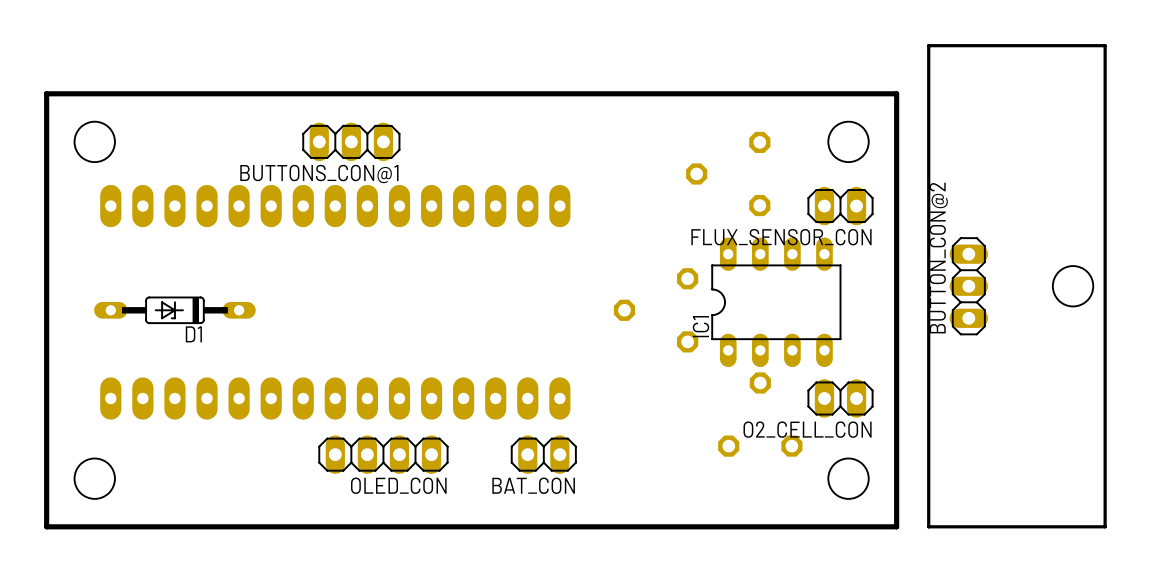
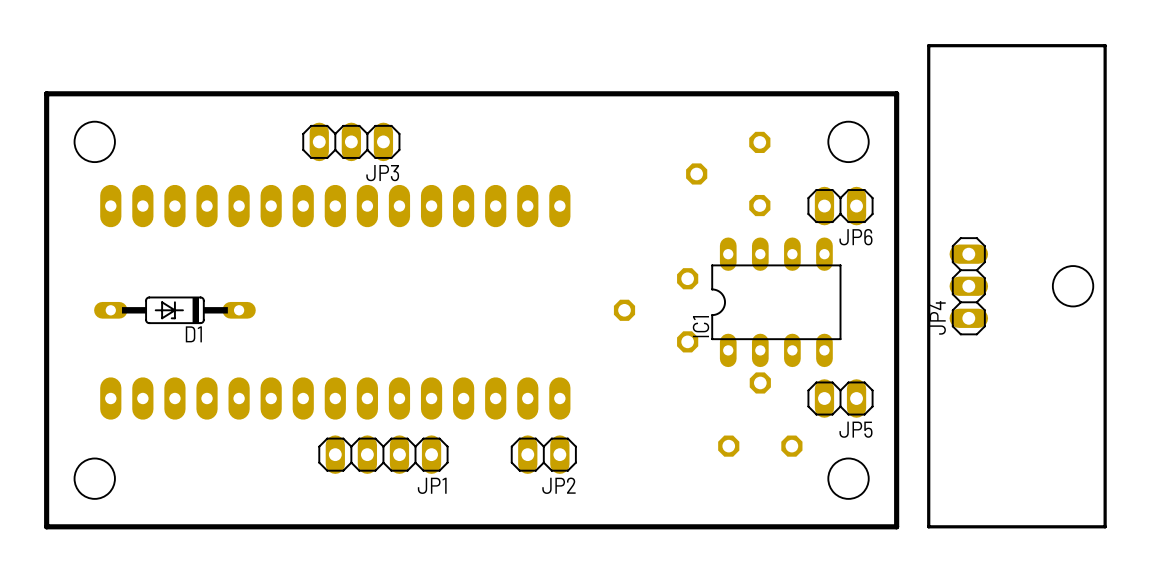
BUTTONS_CON@1 name: BUTTONS_CON@1 (319, 173) -> JP3 (382, 173)
FLUX_SENSOR_CON name: FLUX_SENSOR_CON (781, 237) -> JP6 (855, 237)
BUTTON_CON@2 name: BUTTON_CON@2 (938, 258) -> JP4 (937, 317)
O2_CELL_CON name: O2_CELL_CON (807, 429) -> JP5 (855, 429)
OLED_CON name: OLED_CON (398, 485) -> JP1 (432, 485)
BAT_CON name: BAT_CON (533, 485) -> JP2 (558, 485)

